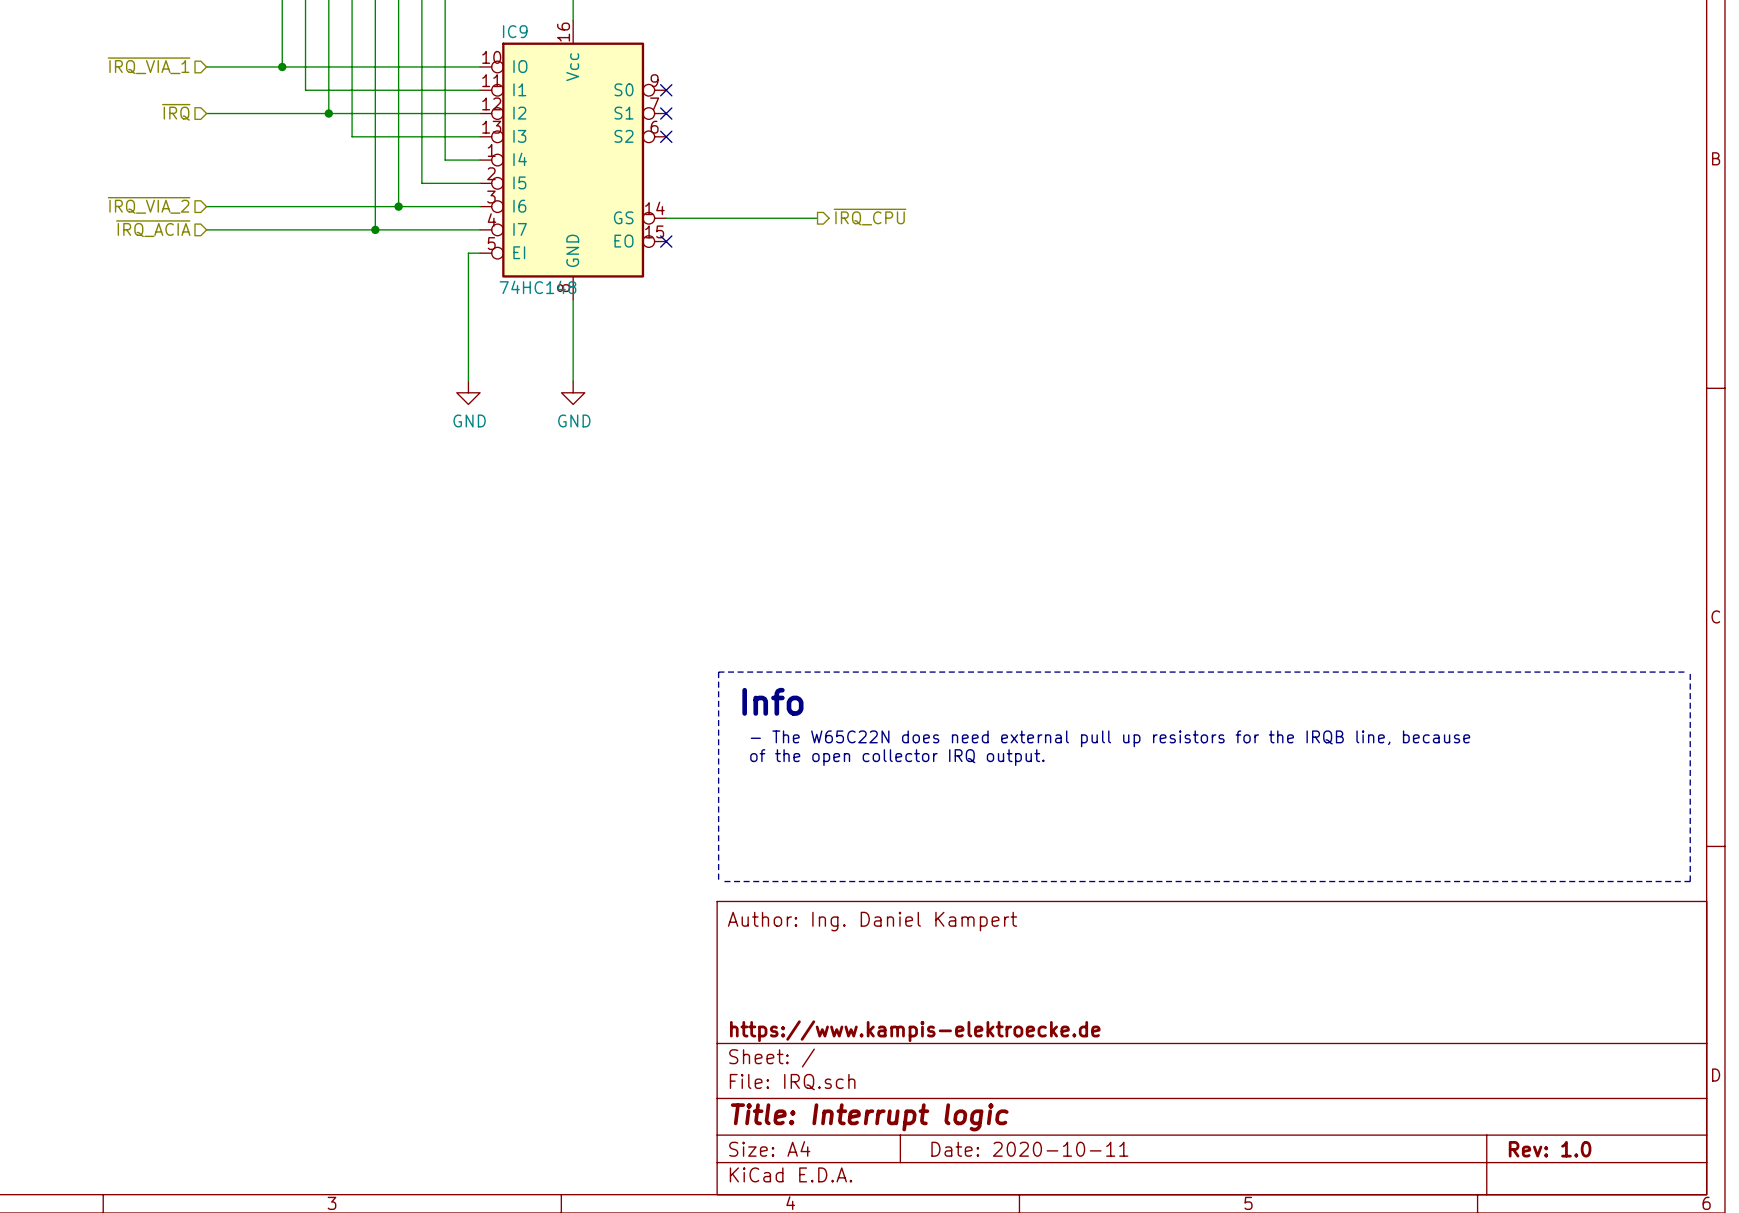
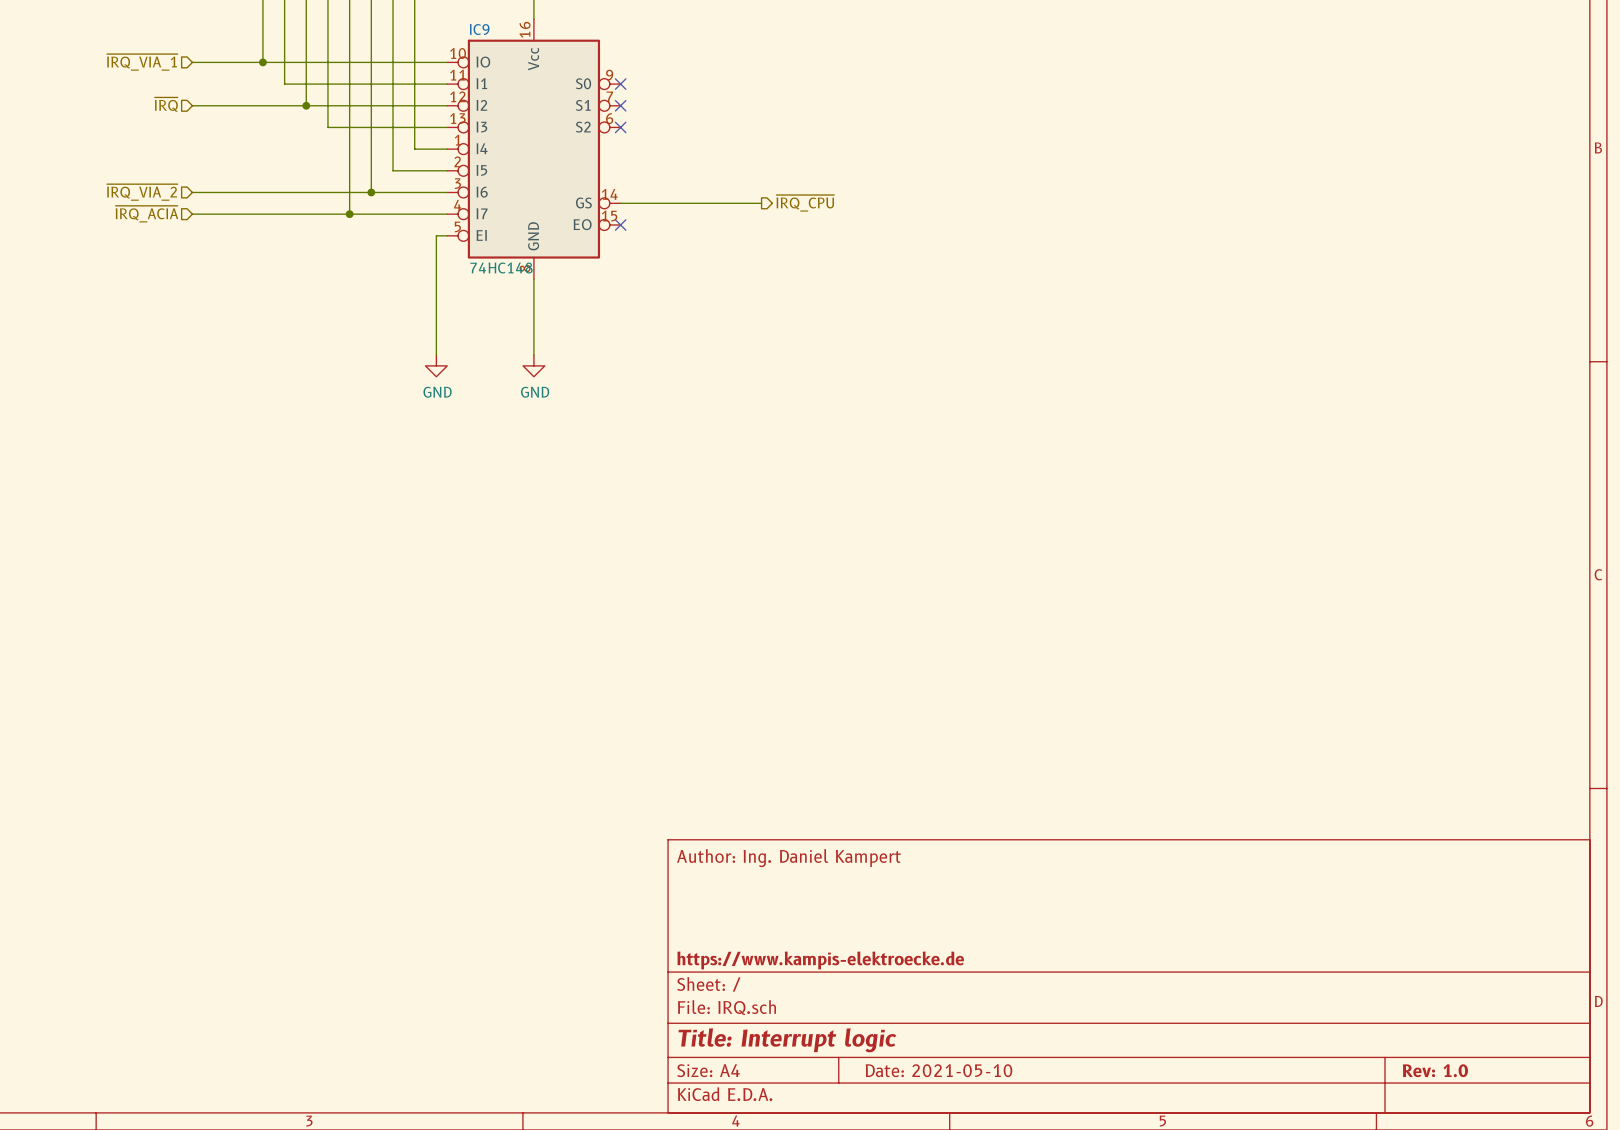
line: (1684, 672) (718, 672) (718, 881) -> none
line: (1690, 672) (1690, 881) (724, 881) -> none
text: Info (772, 701) -> none
text: - The W65C22N does need external pull up resistors for the IRQB line, because (1110, 738) -> none
text: of the open collector IRQ output. (897, 757) -> none
title block: Date: 2020-10-11 (1029, 1149) -> Date: 2021-05-10 (939, 1070)

